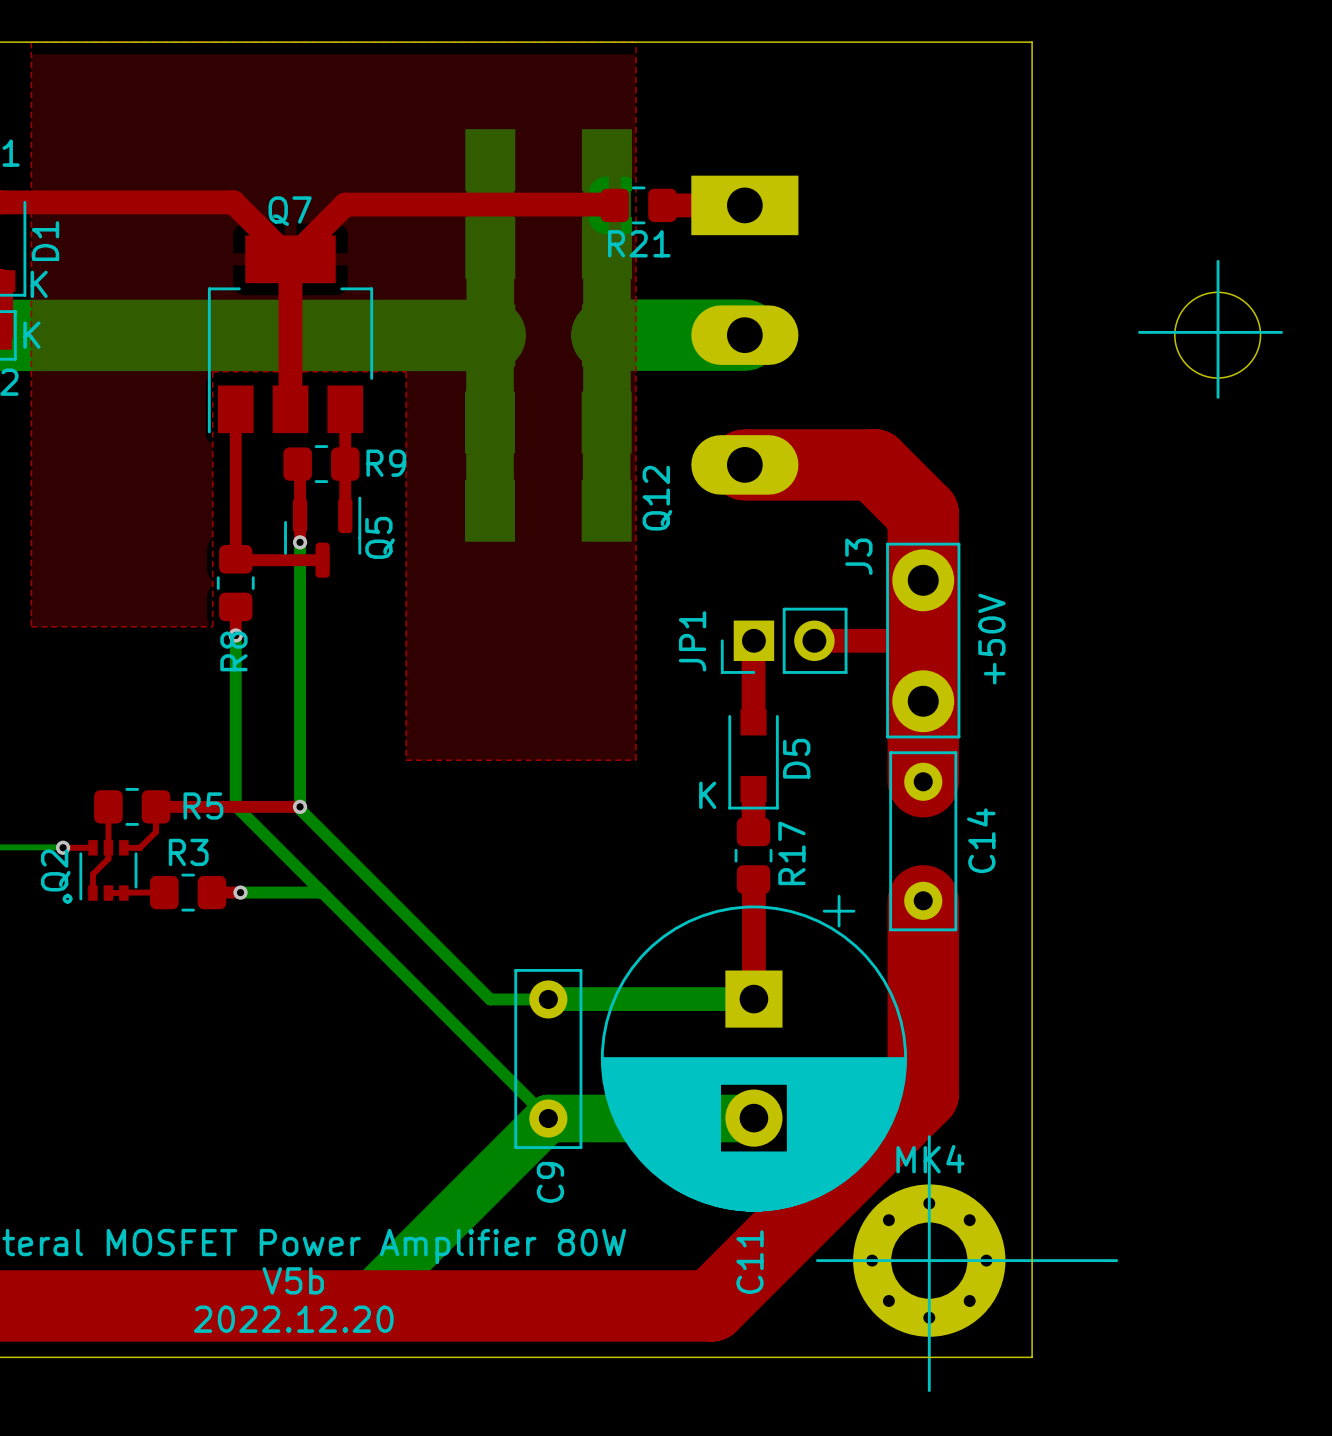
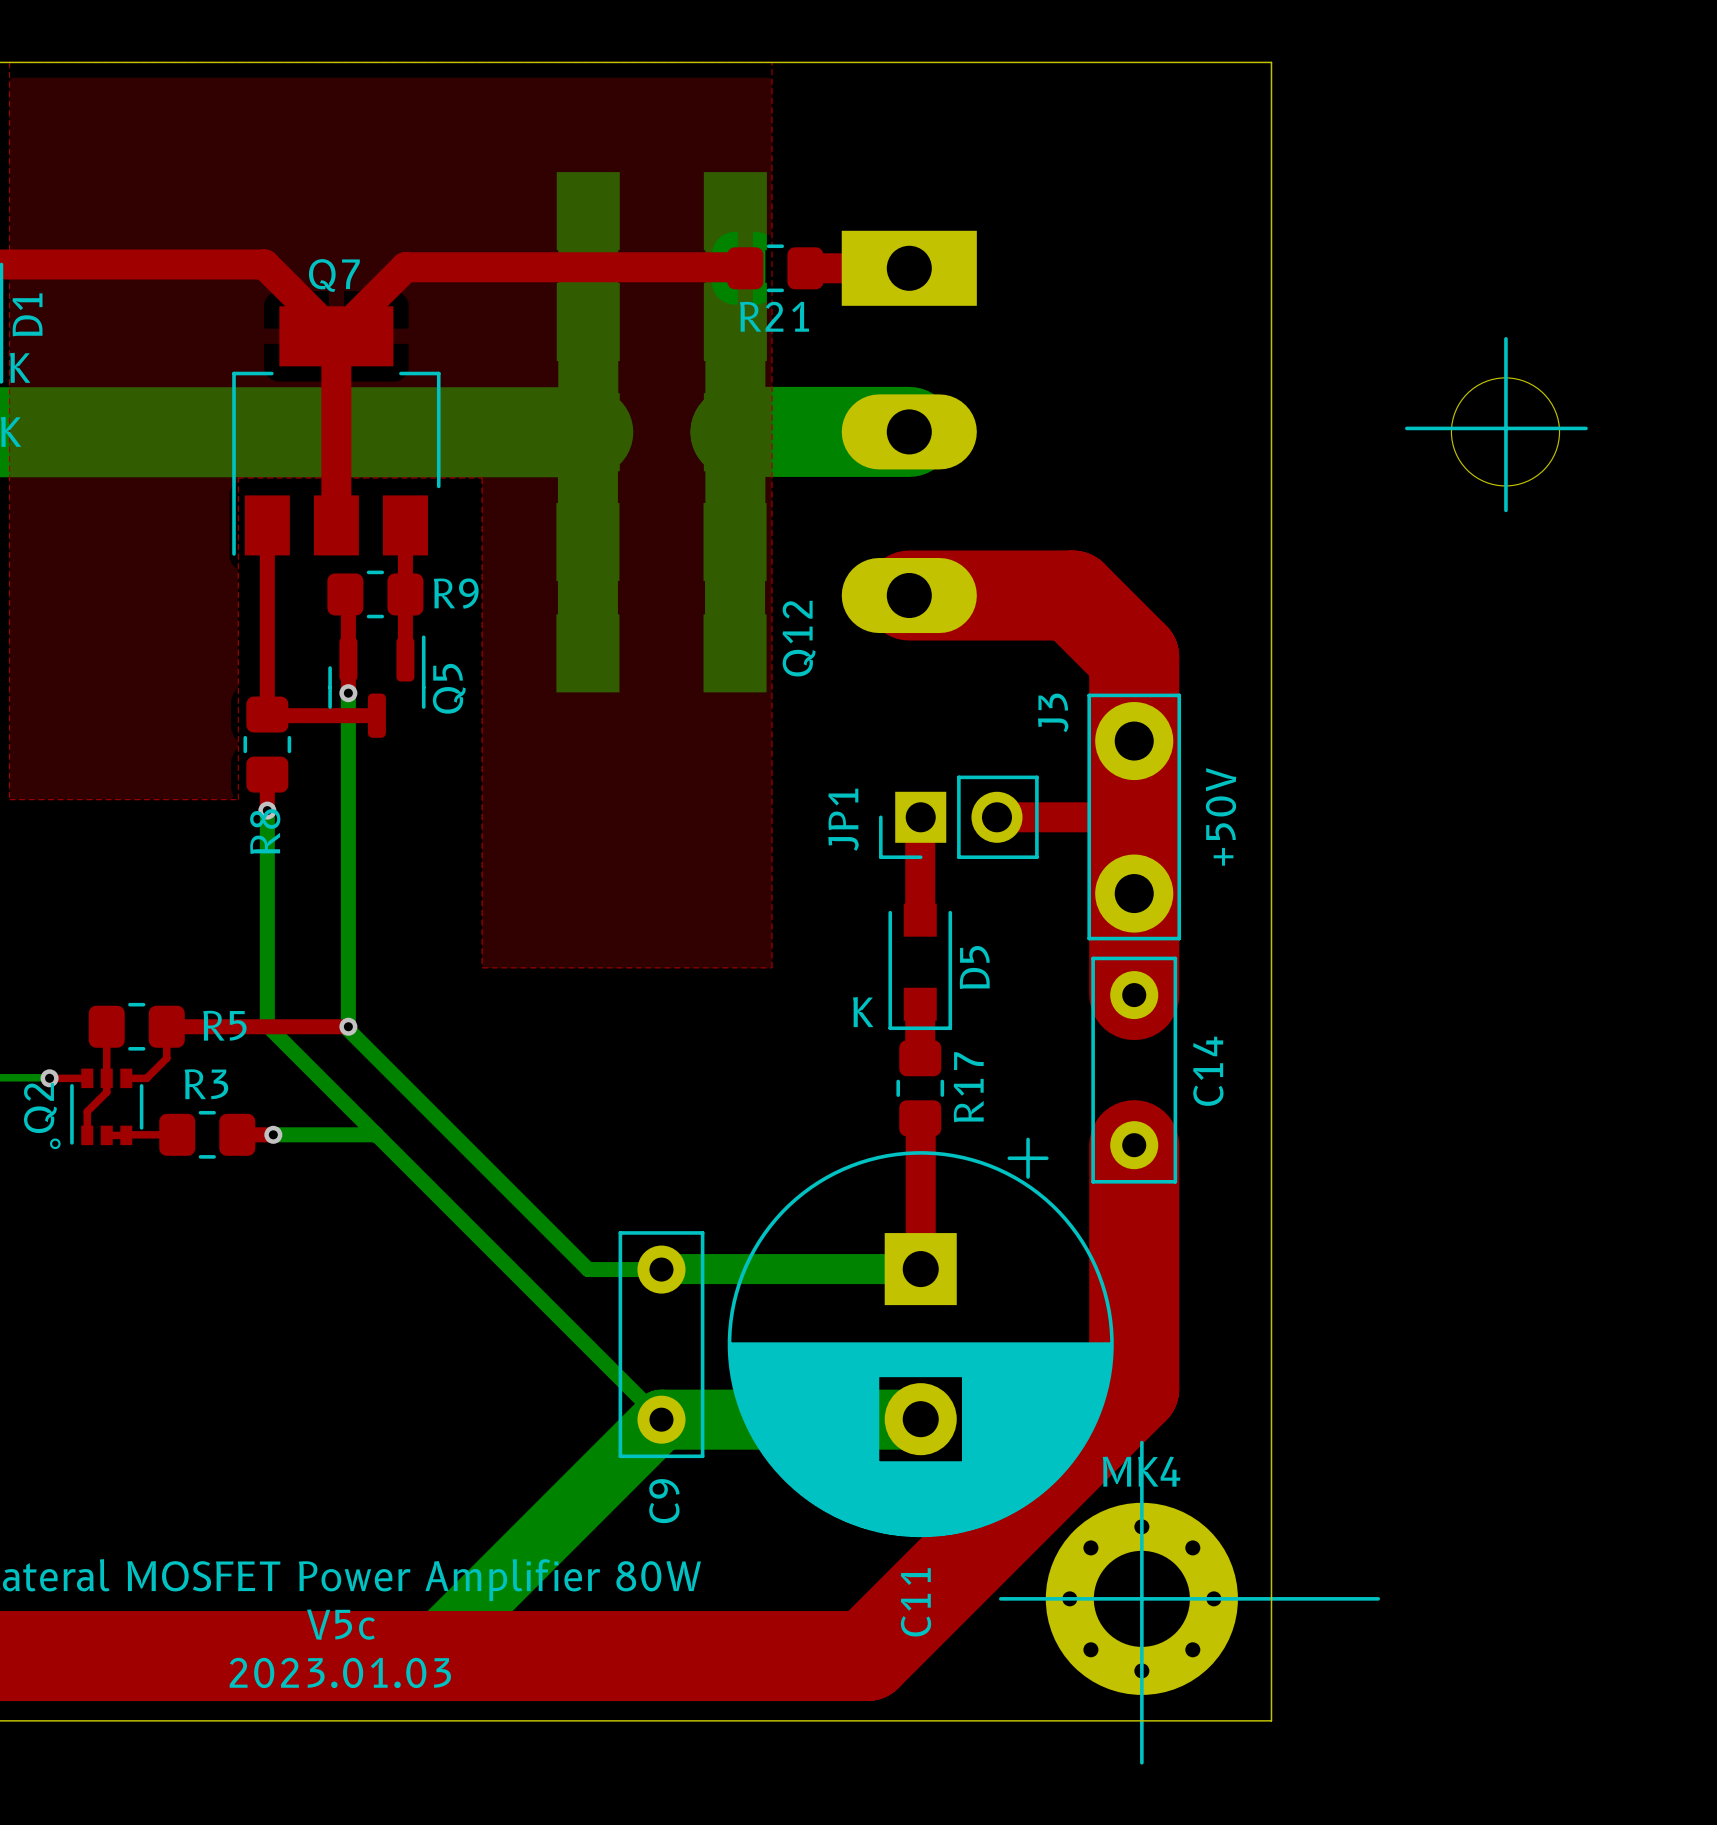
text: V5b (293, 1280) -> V5c (340, 1624)
text: 2022.12.20 (293, 1319) -> 2023.01.03 (340, 1672)

